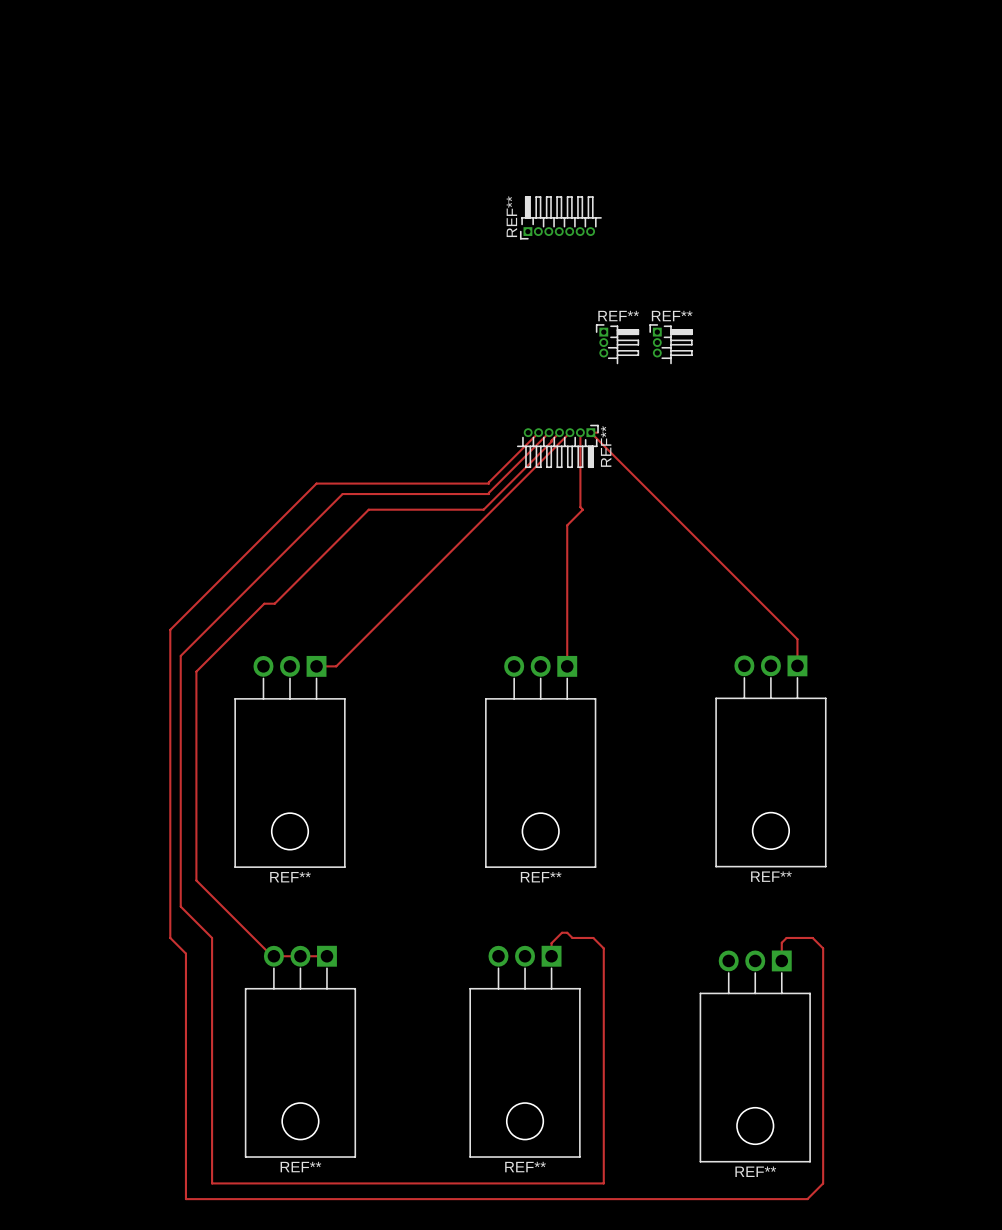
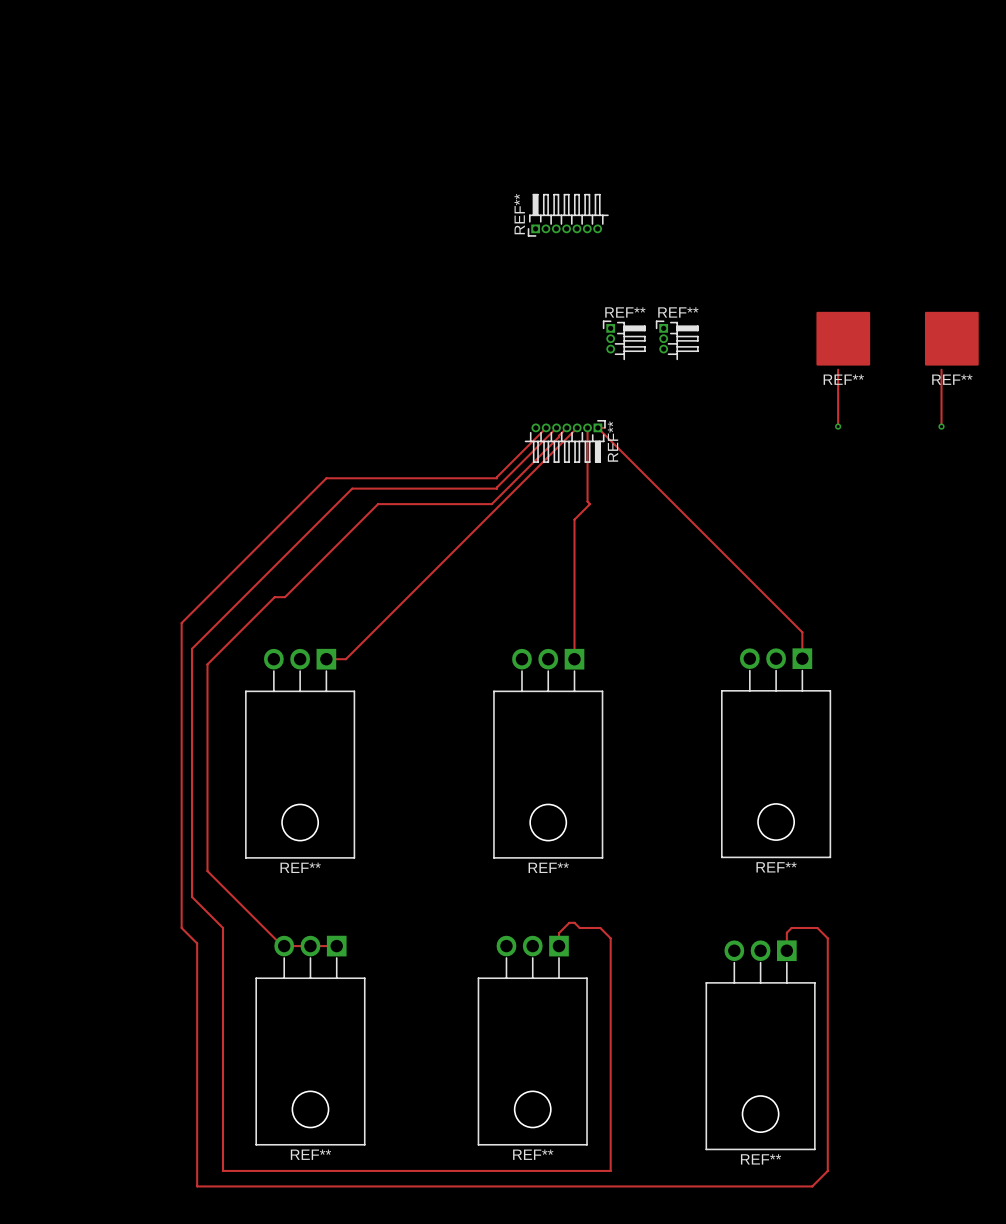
REF**: none -> (843, 338)
REF**: none -> (951, 338)
track: none -> (838, 369) (838, 426)
track: none -> (941, 369) (941, 426)
via: none -> (838, 426)
via: none -> (941, 426)

